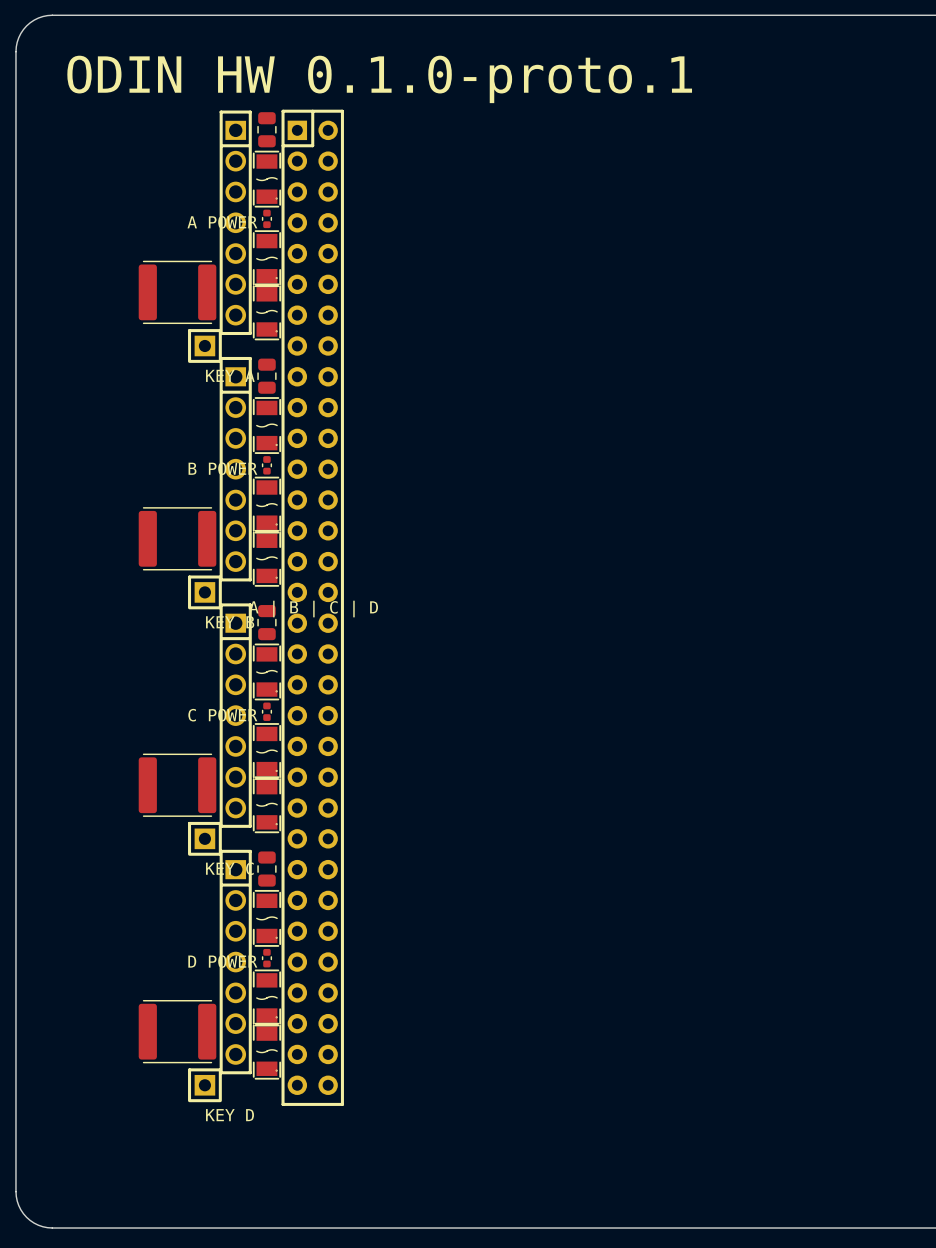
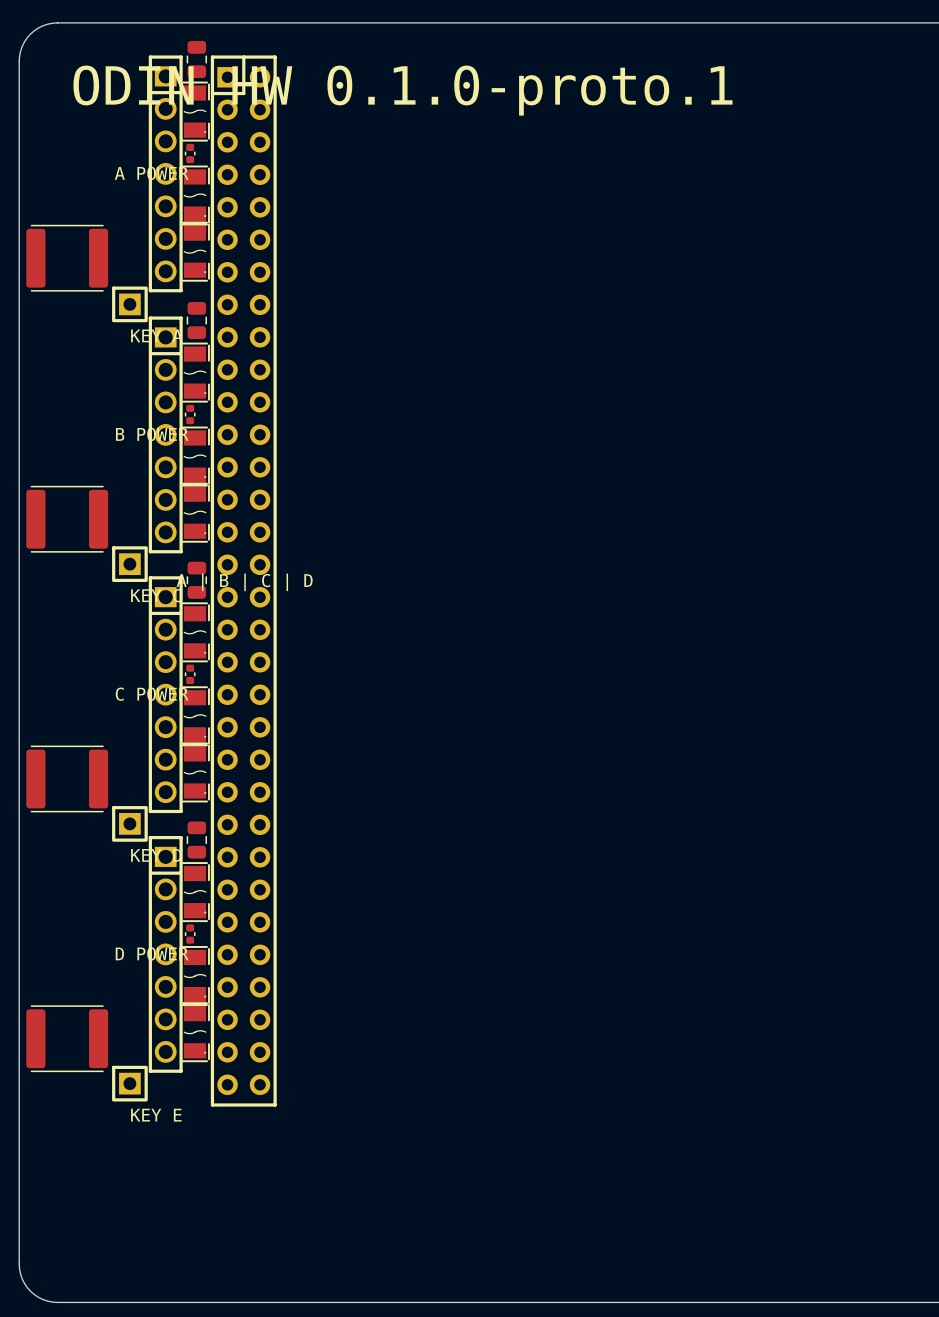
part: none -> (195, 111)
part position: (266, 129) -> (196, 59)
part: none -> (190, 153)
part: none -> (195, 195)
part: (266, 179) -> none
part: (266, 218) -> none
part position: (235, 222) -> (165, 173)
part: none -> (195, 251)
part: none -> (67, 258)
part: (266, 258) -> none
part footprint: [138, 260, 217, 325] -> [186, 301, 208, 340]
part: (266, 311) -> none
part position: (204, 345) -> (129, 304)
part: none -> (195, 372)
part: (266, 376) -> none
part: none -> (190, 414)
part: (266, 425) -> none
part: none -> (195, 456)
part: (266, 465) -> none
part position: (235, 469) -> (165, 434)
part: none -> (195, 512)
part: none -> (67, 519)
part: (266, 505) -> none
part footprint: [138, 507, 217, 571] -> [186, 561, 208, 599]
part: none -> (129, 564)
part: (266, 558) -> none
part: none -> (195, 632)
part: (204, 592) -> none
part position: (312, 607) -> (243, 581)
part: (266, 622) -> none
part: none -> (190, 674)
part: (266, 671) -> none
part: none -> (195, 716)
part: (266, 711) -> none
part position: (235, 715) -> (165, 694)
part: none -> (195, 772)
part: none -> (67, 778)
part: (266, 751) -> none
part footprint: [138, 753, 217, 817] -> [186, 821, 208, 859]
part: none -> (129, 823)
part: (266, 804) -> none
part: (204, 838) -> none
part: none -> (195, 892)
part: (266, 869) -> none
part: none -> (190, 934)
part: none -> (195, 976)
part: (266, 918) -> none
part: (266, 958) -> none
part position: (235, 962) -> (165, 954)
part: none -> (195, 1032)
part: (266, 997) -> none
part: none -> (129, 1083)
part position: (177, 1031) -> (67, 1038)
part: (266, 1051) -> none
part: (204, 1085) -> none

